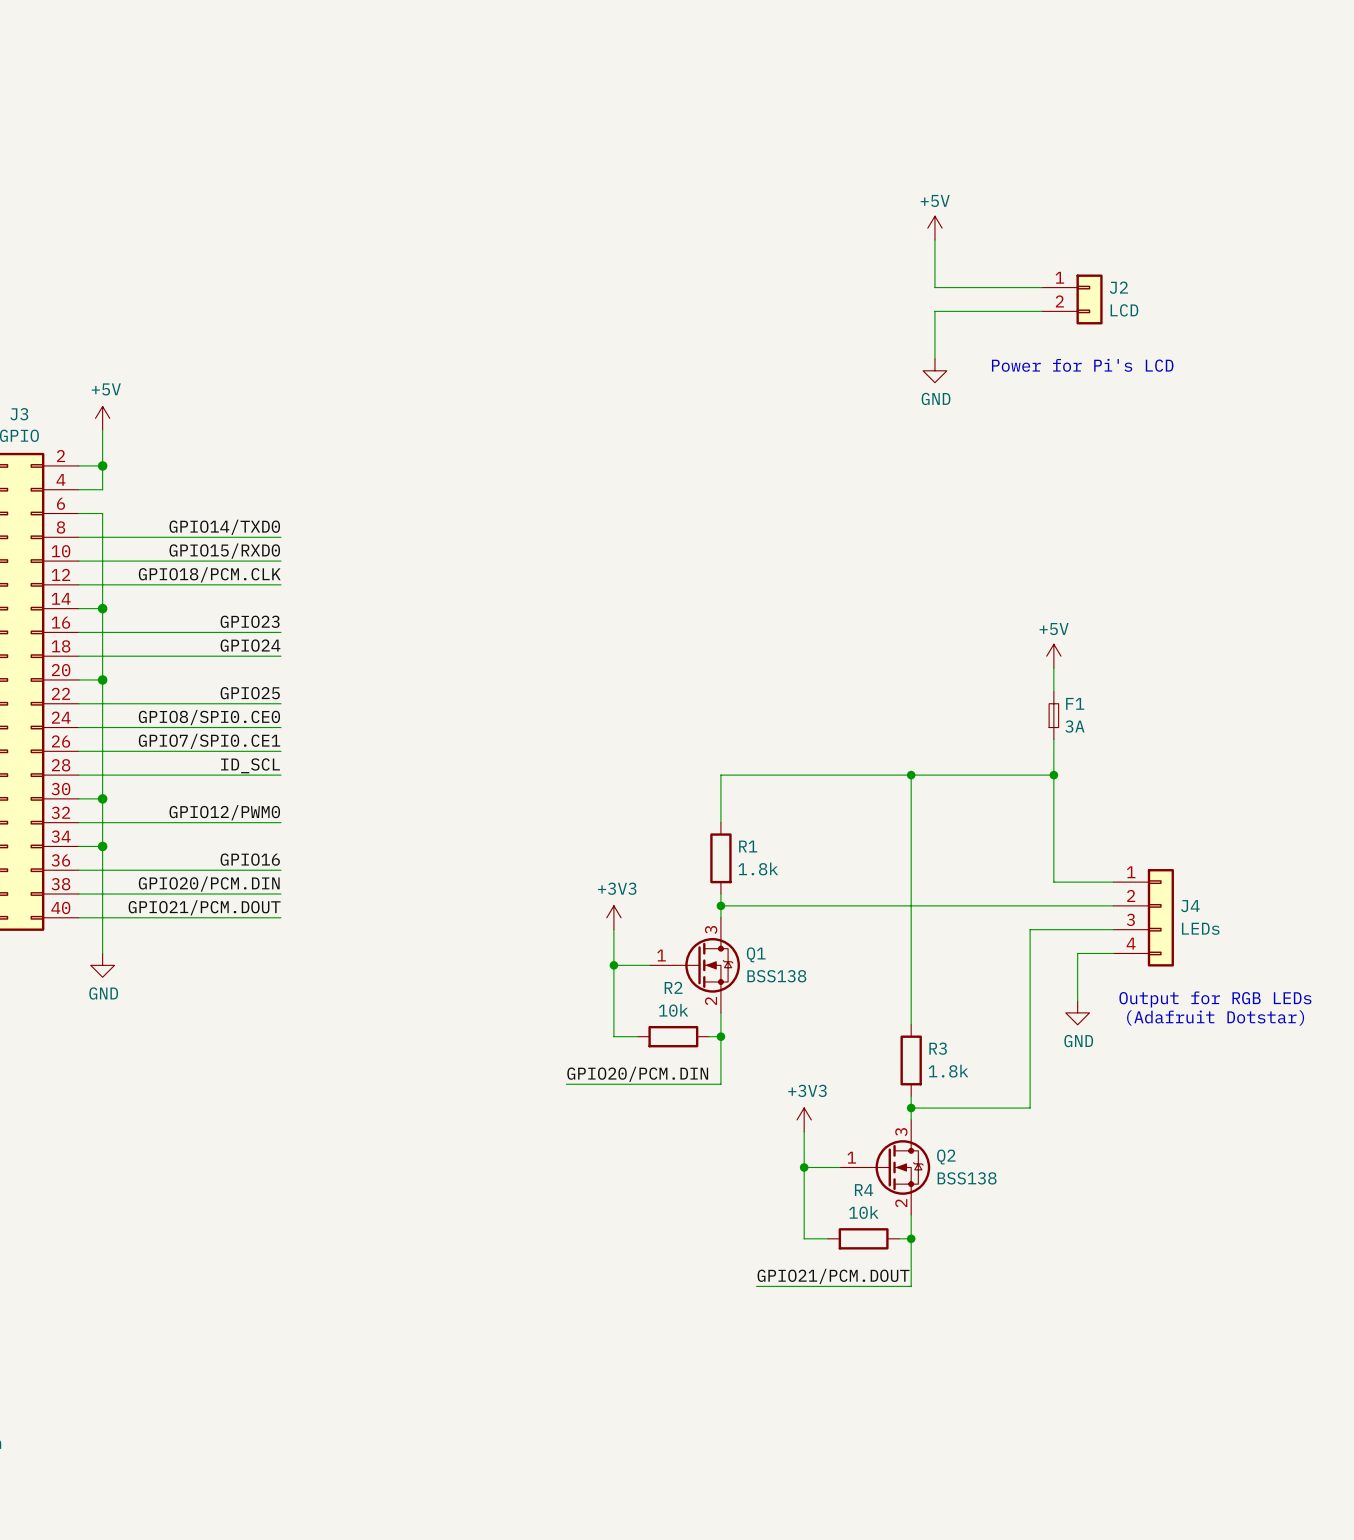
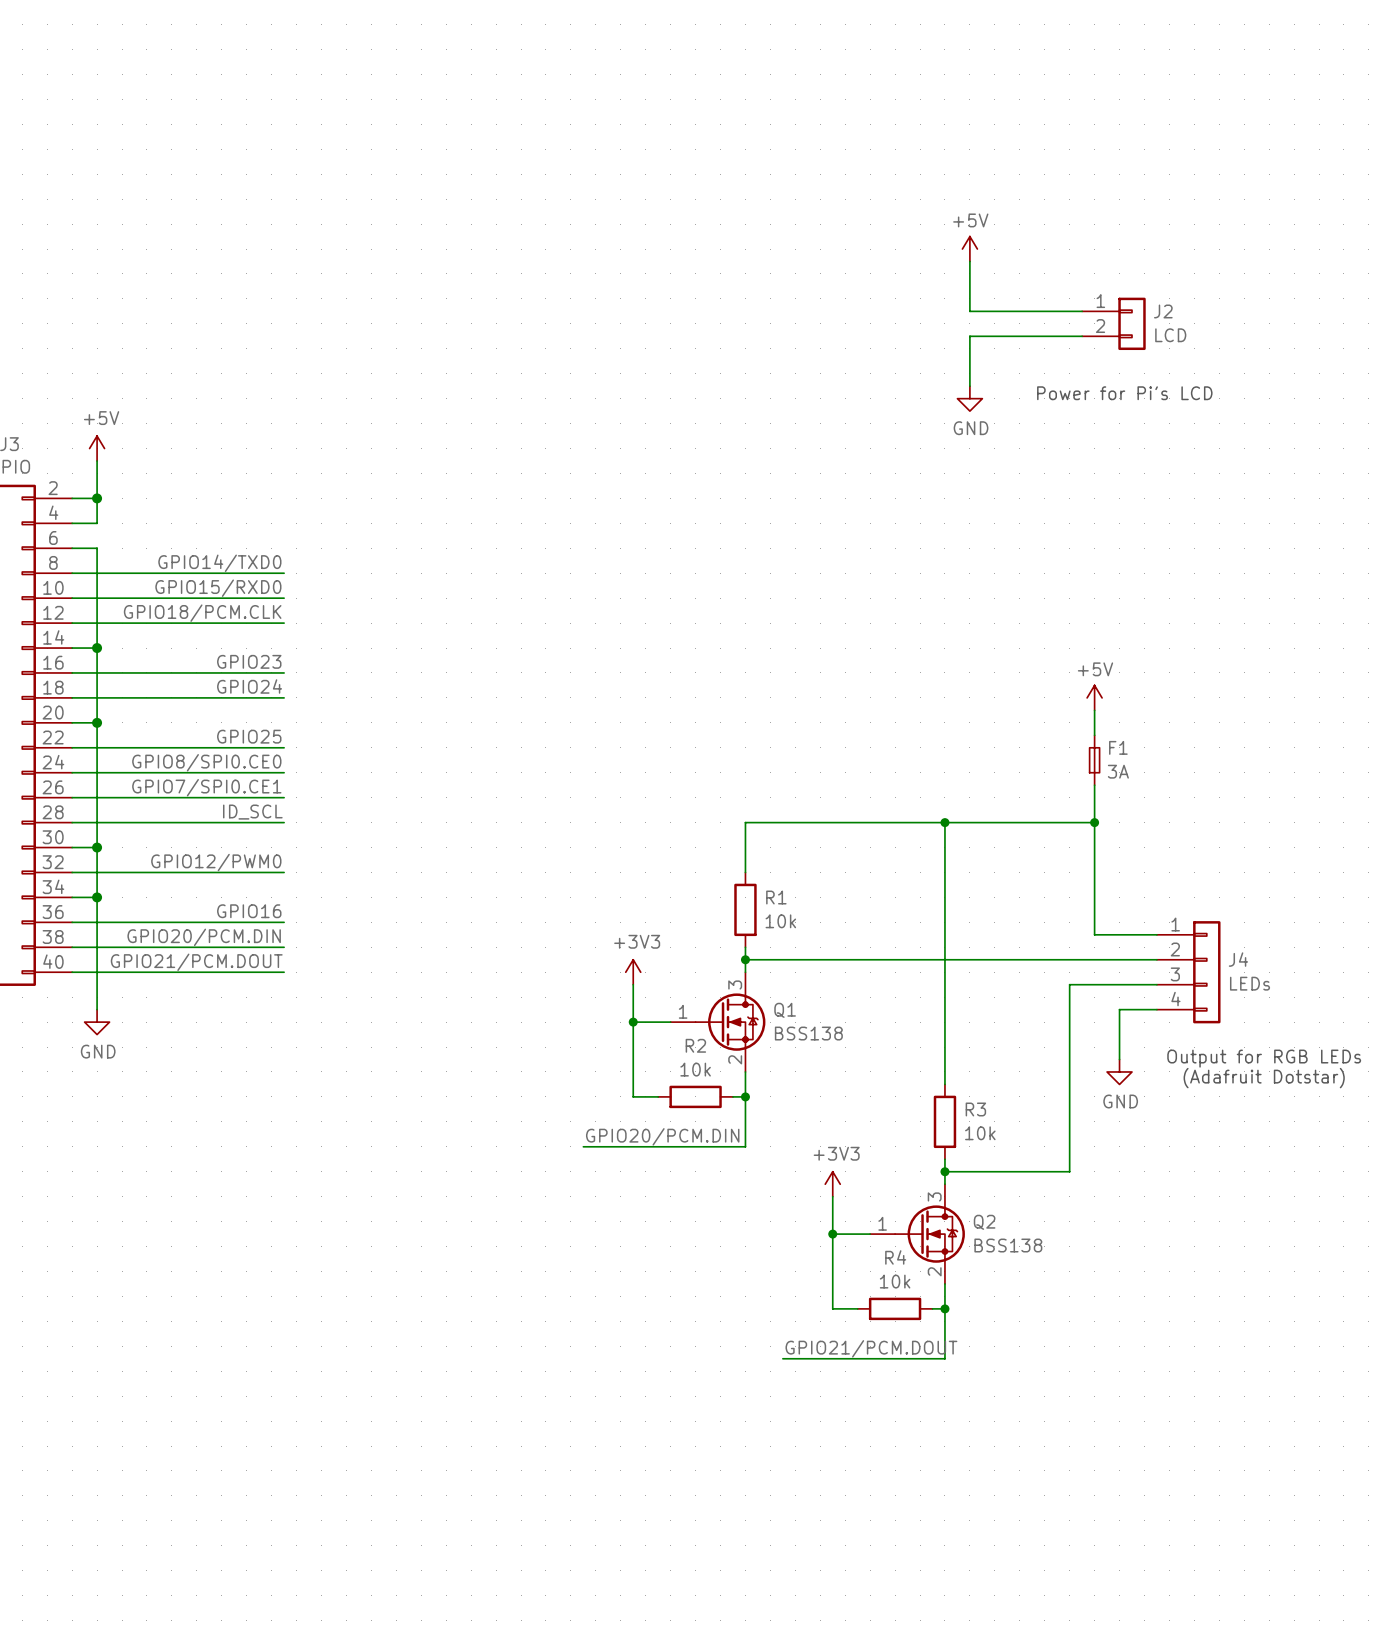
R1 value: 1.8k (758, 868) -> 10k (780, 921)
R3 value: 1.8k (948, 1071) -> 10k (980, 1133)

